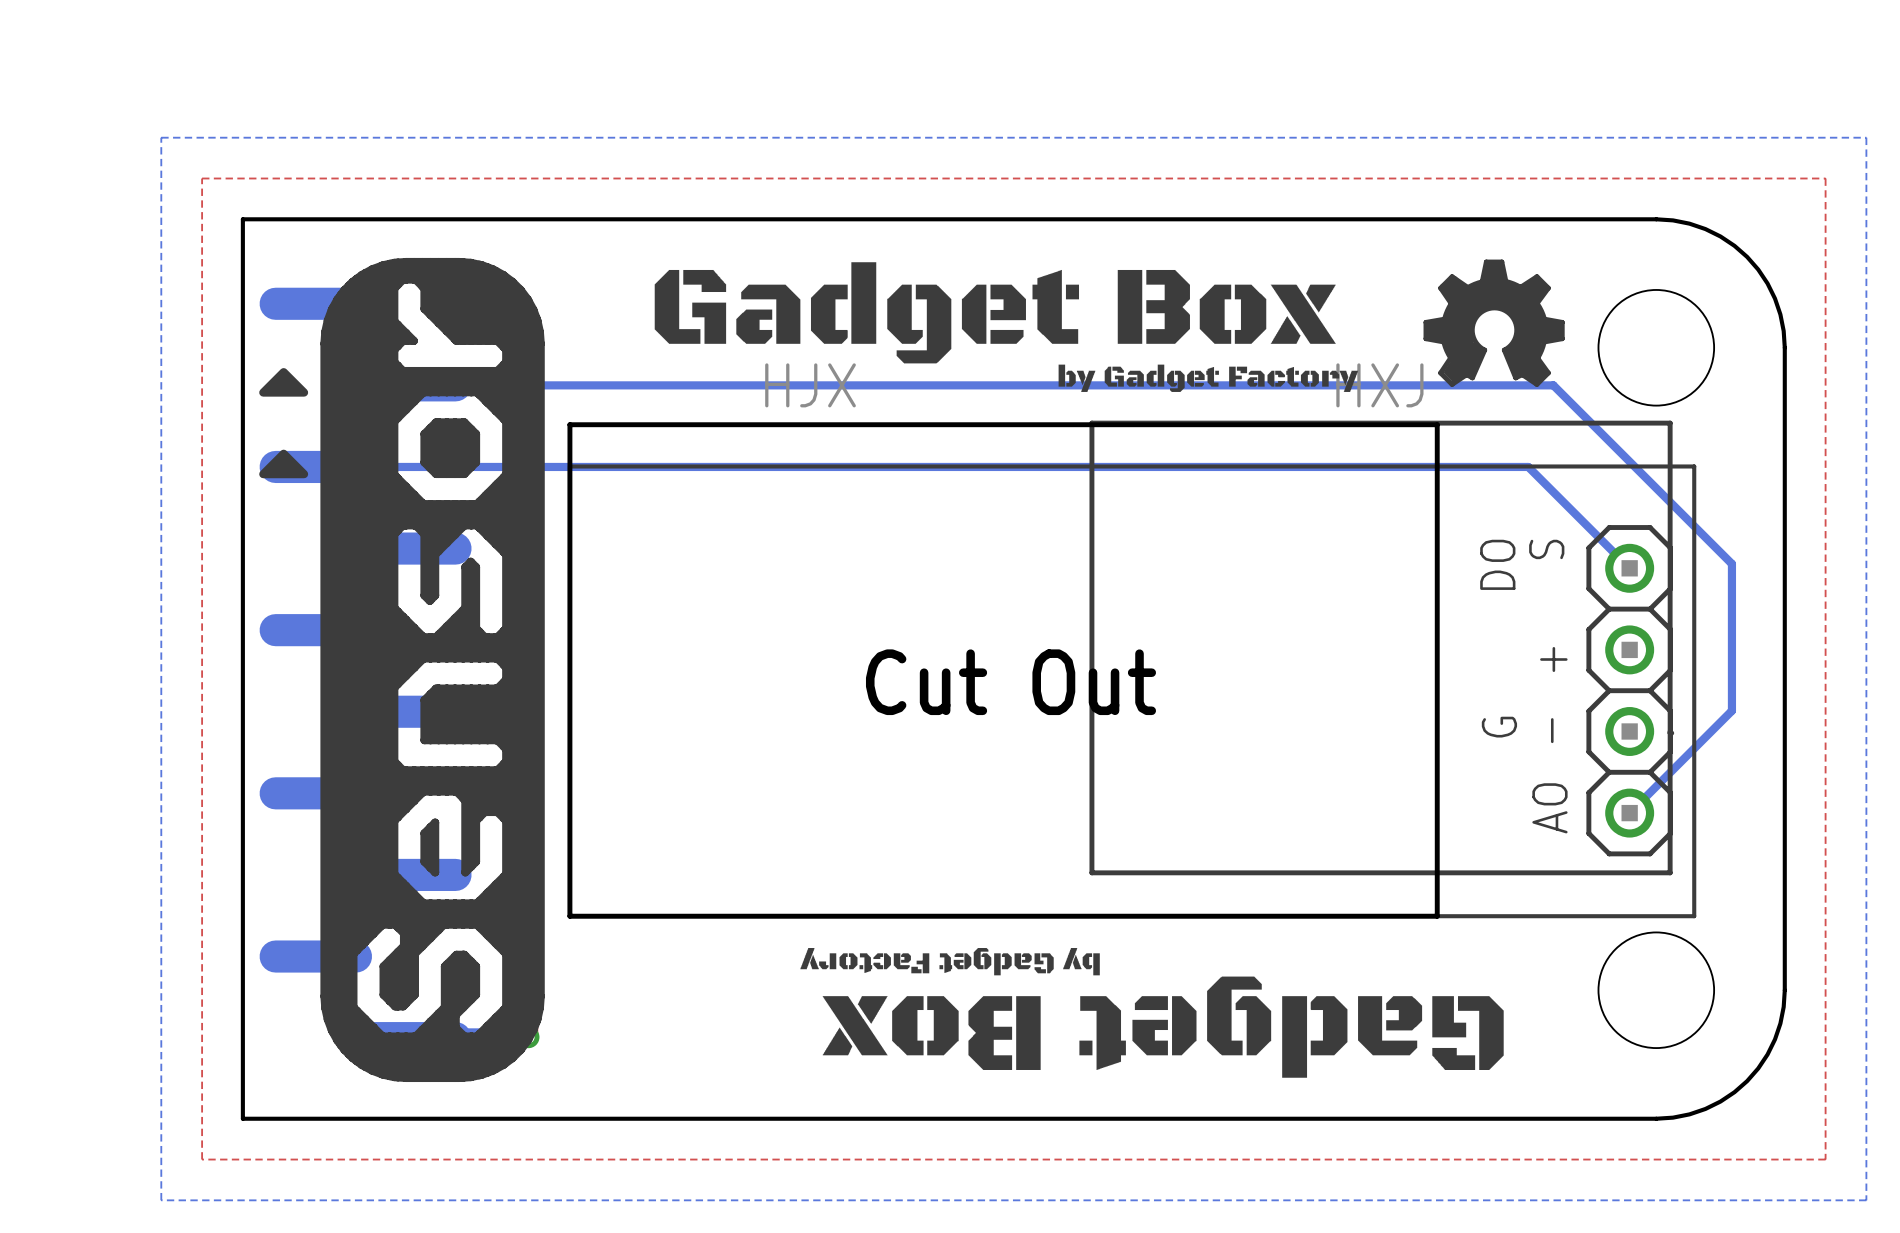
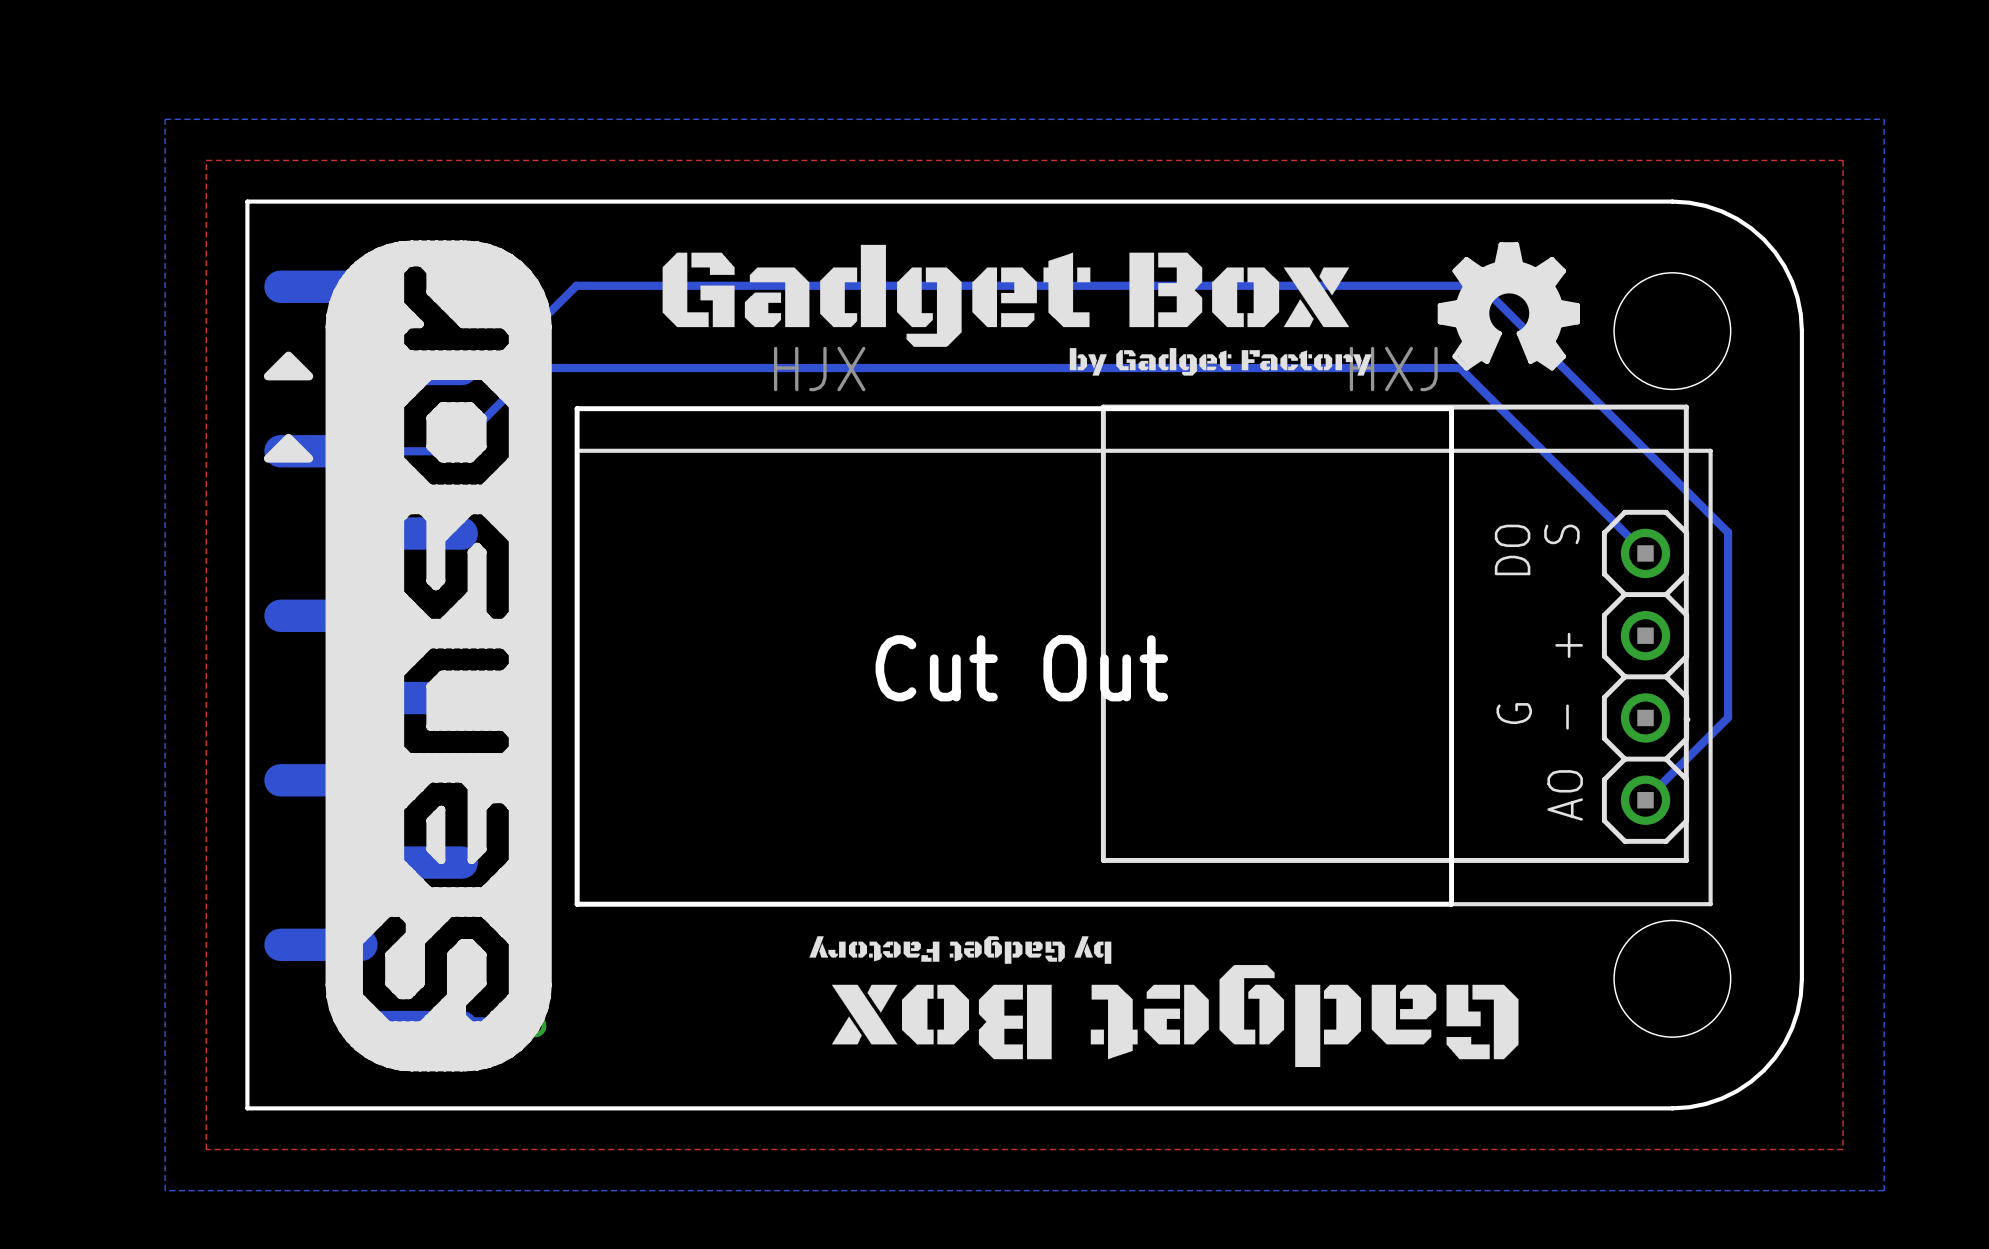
bottom track: (486, 385) (1553, 385) (1731, 563) (1731, 710) (1711, 731) -> (493, 369) (576, 285) (1481, 285) (1728, 532) (1728, 717)
bottom track: (445, 466) (1528, 466) -> (452, 451) (535, 368) (1460, 368) (1543, 451)

